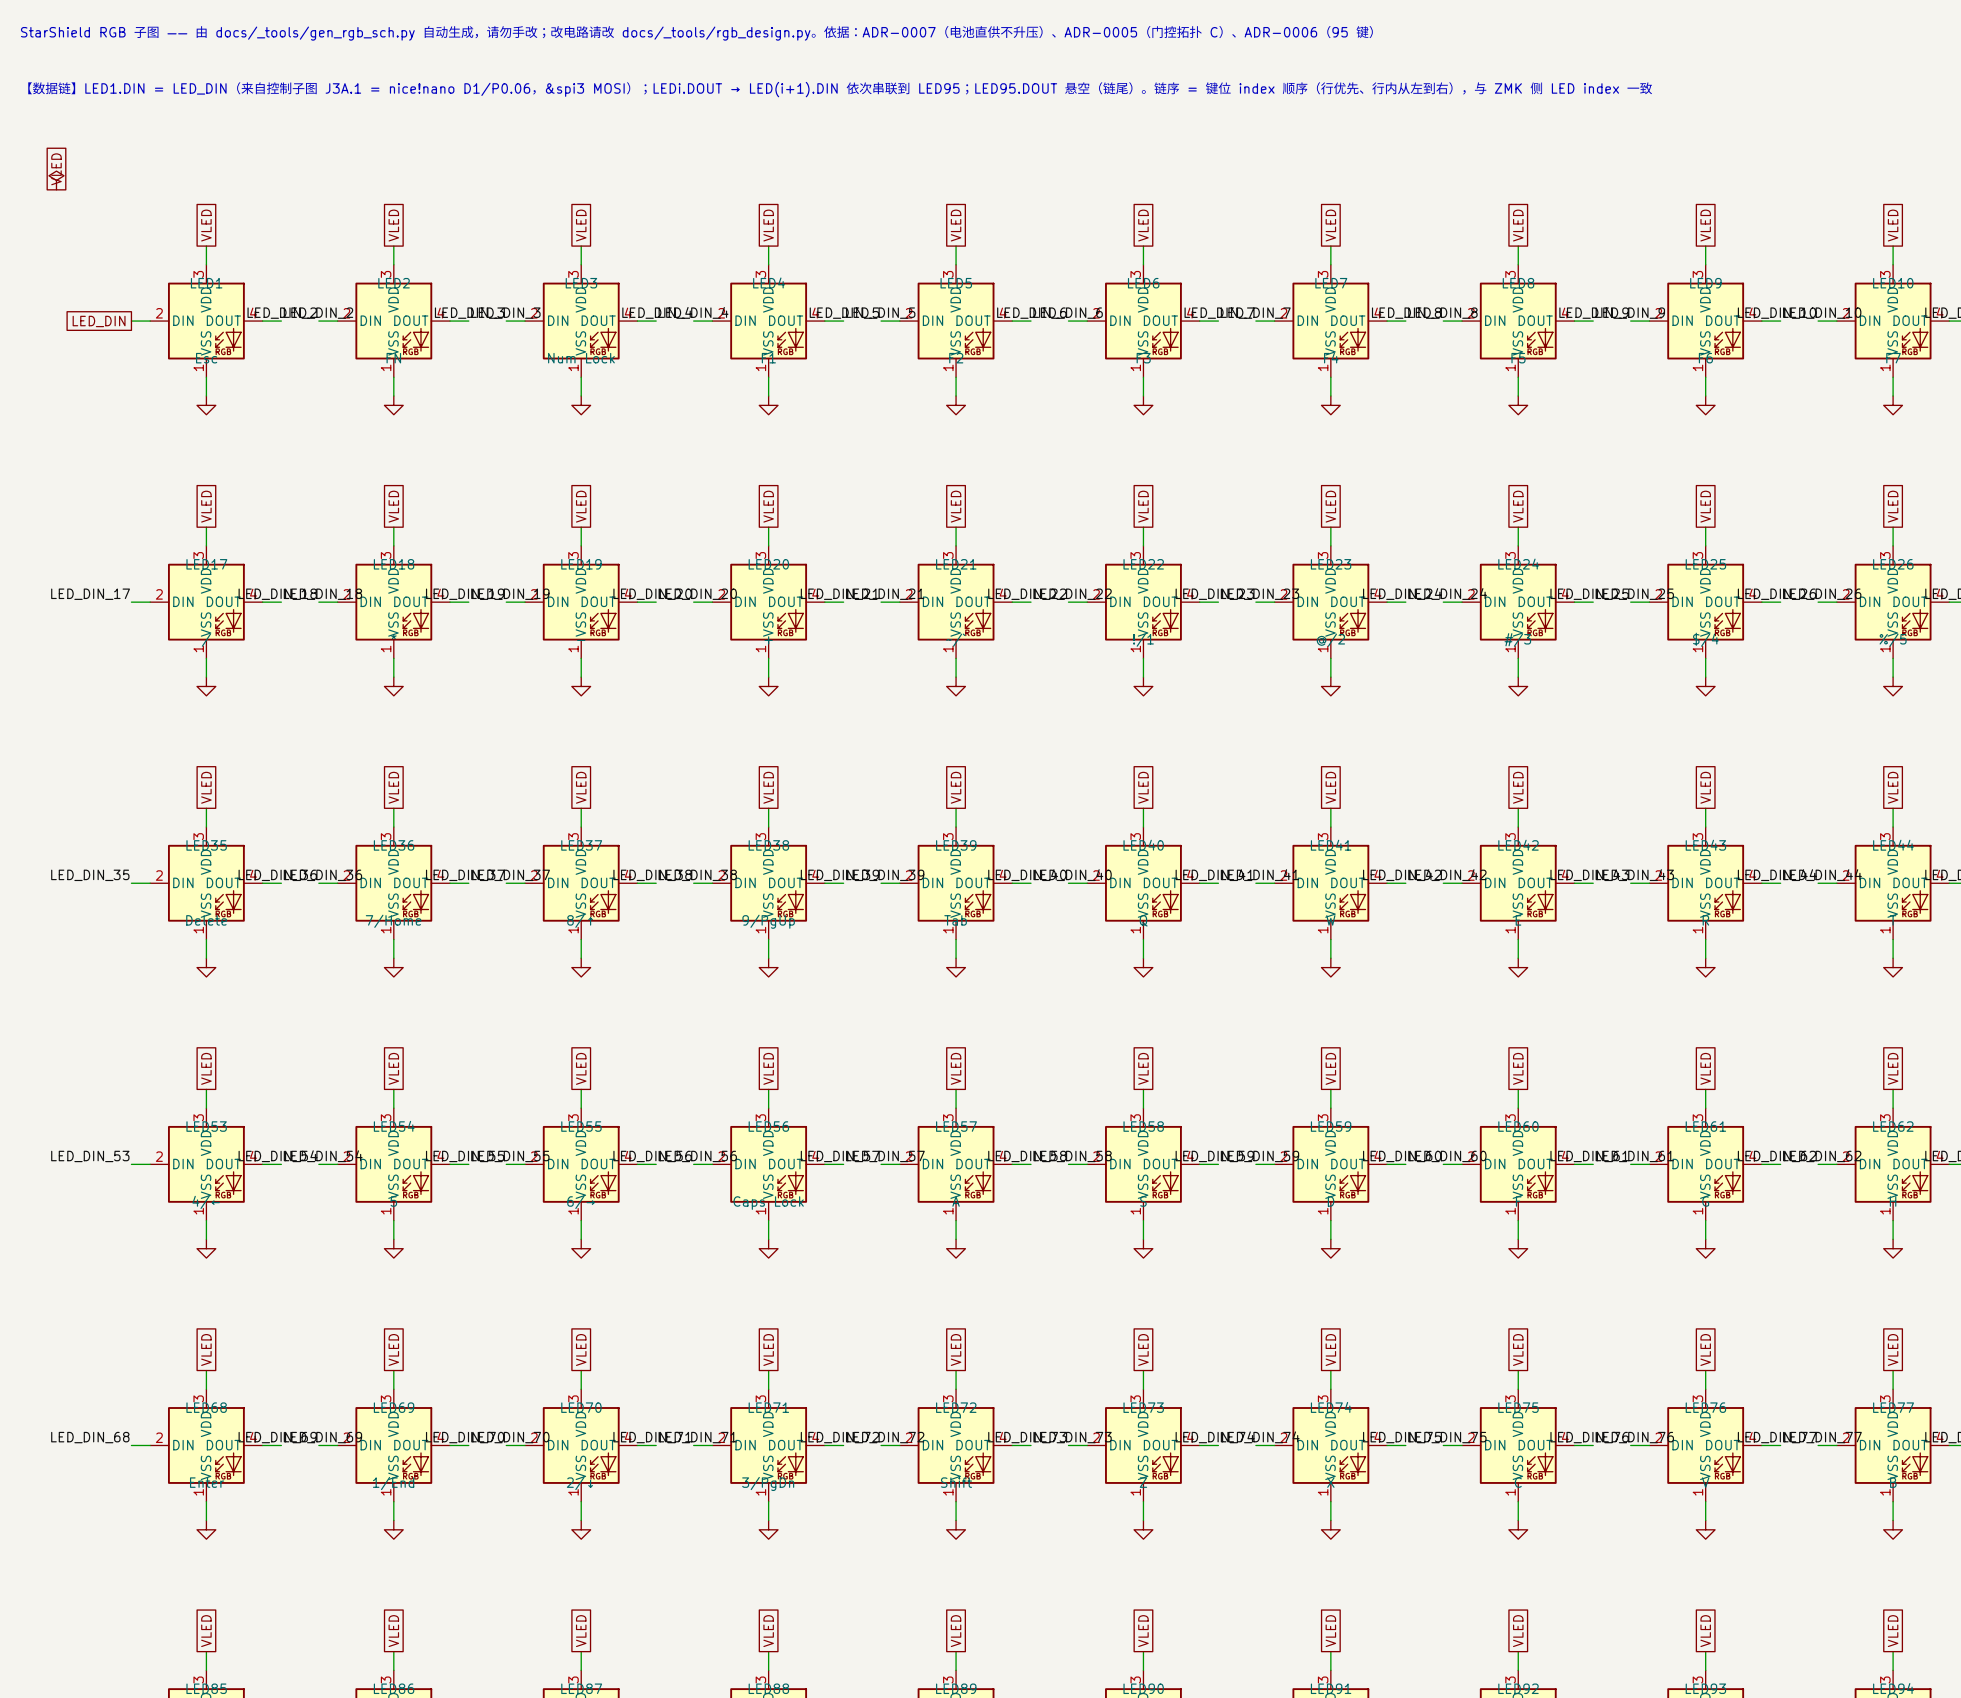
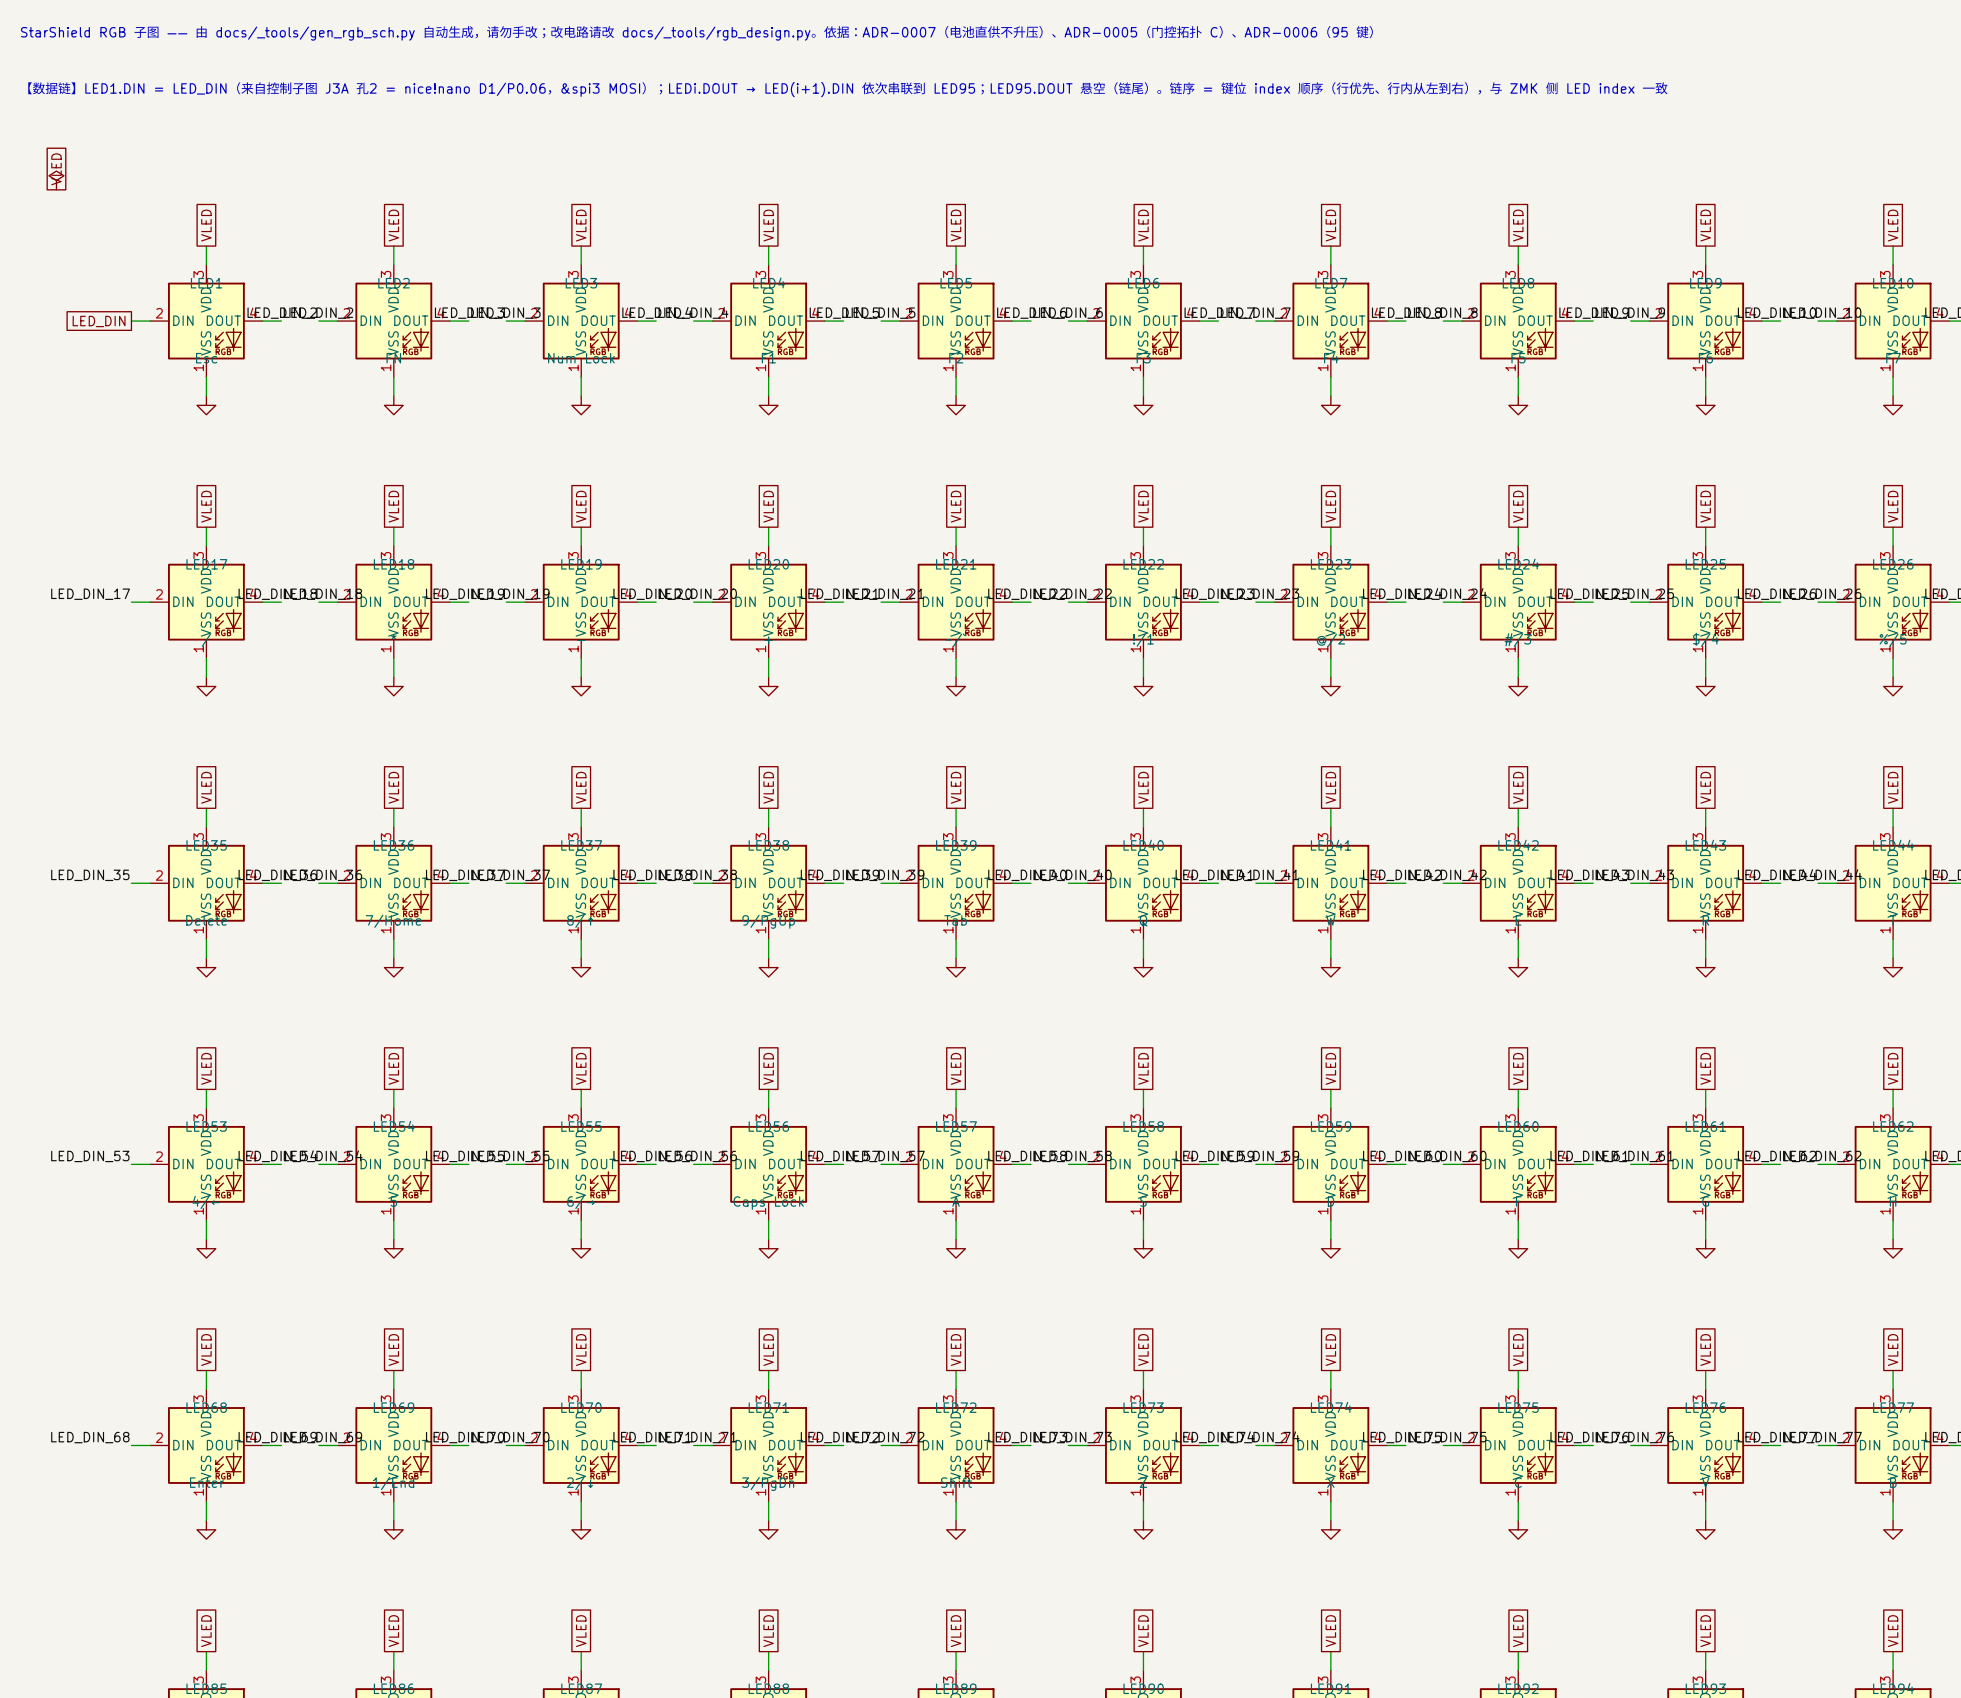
text: 【数据链】LED1.DIN = LED_DIN（来自控制子图 J3A.1 = nice!nano D1/P0.06，&spi3 MOSI）；LEDi.DOUT → LED(i+1).DIN 依次串联到 LED95；LED95.DOUT 悬空（链尾）。链序 = 键位 index 顺序（行优先、行内从左到右），与 ZMK 侧 LED index 一致 (840, 89) -> 【数据链】LED1.DIN = LED_DIN（来自控制子图 J3A 孔2 = nice!nano D1/P0.06，&spi3 MOSI）；LEDi.DOUT → LED(i+1).DIN 依次串联到 LED95；LED95.DOUT 悬空（链尾）。链序 = 键位 index 顺序（行优先、行内从左到右），与 ZMK 侧 LED index 一致 (847, 89)

